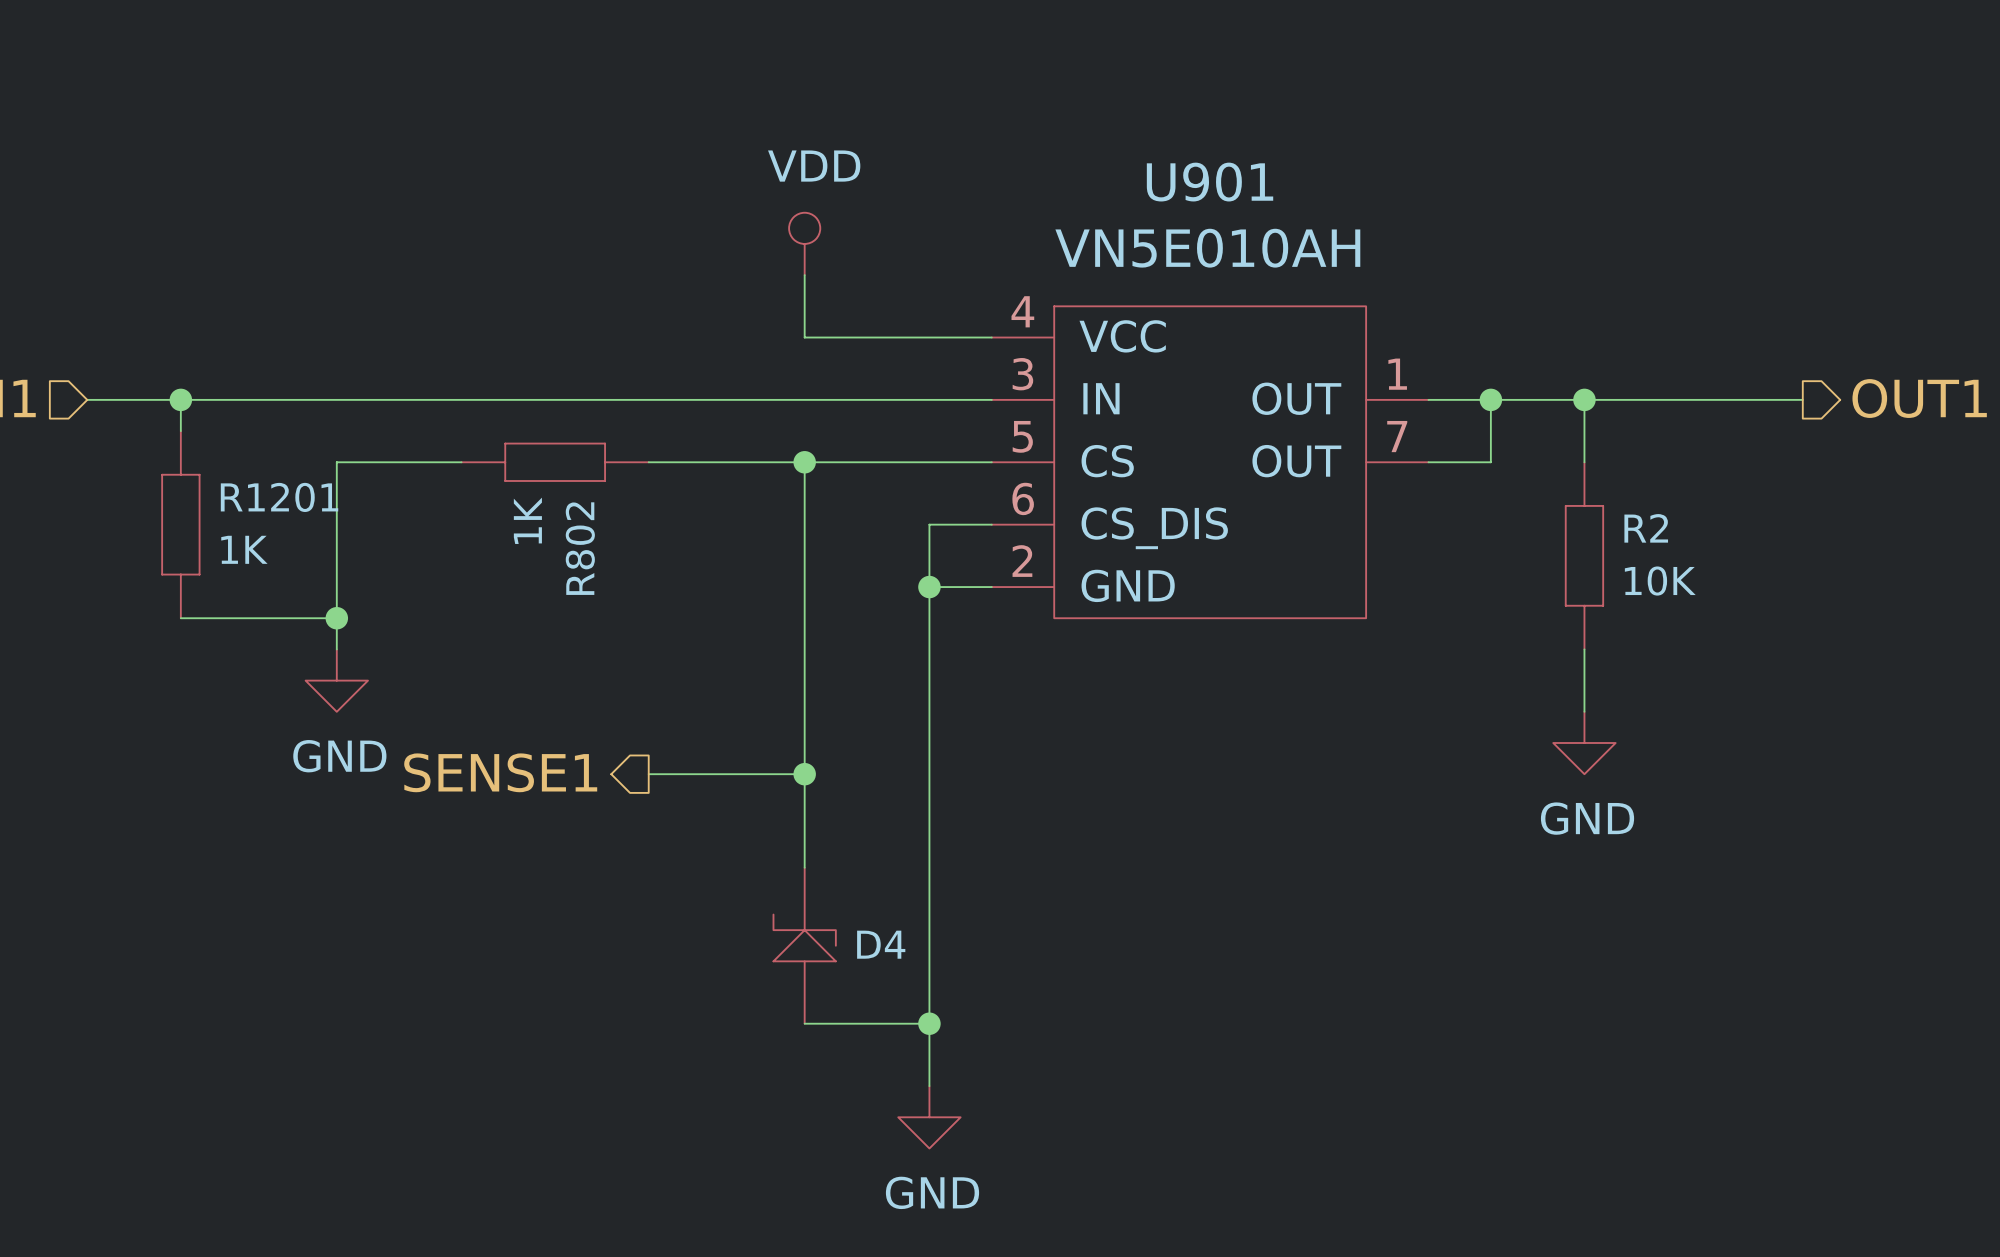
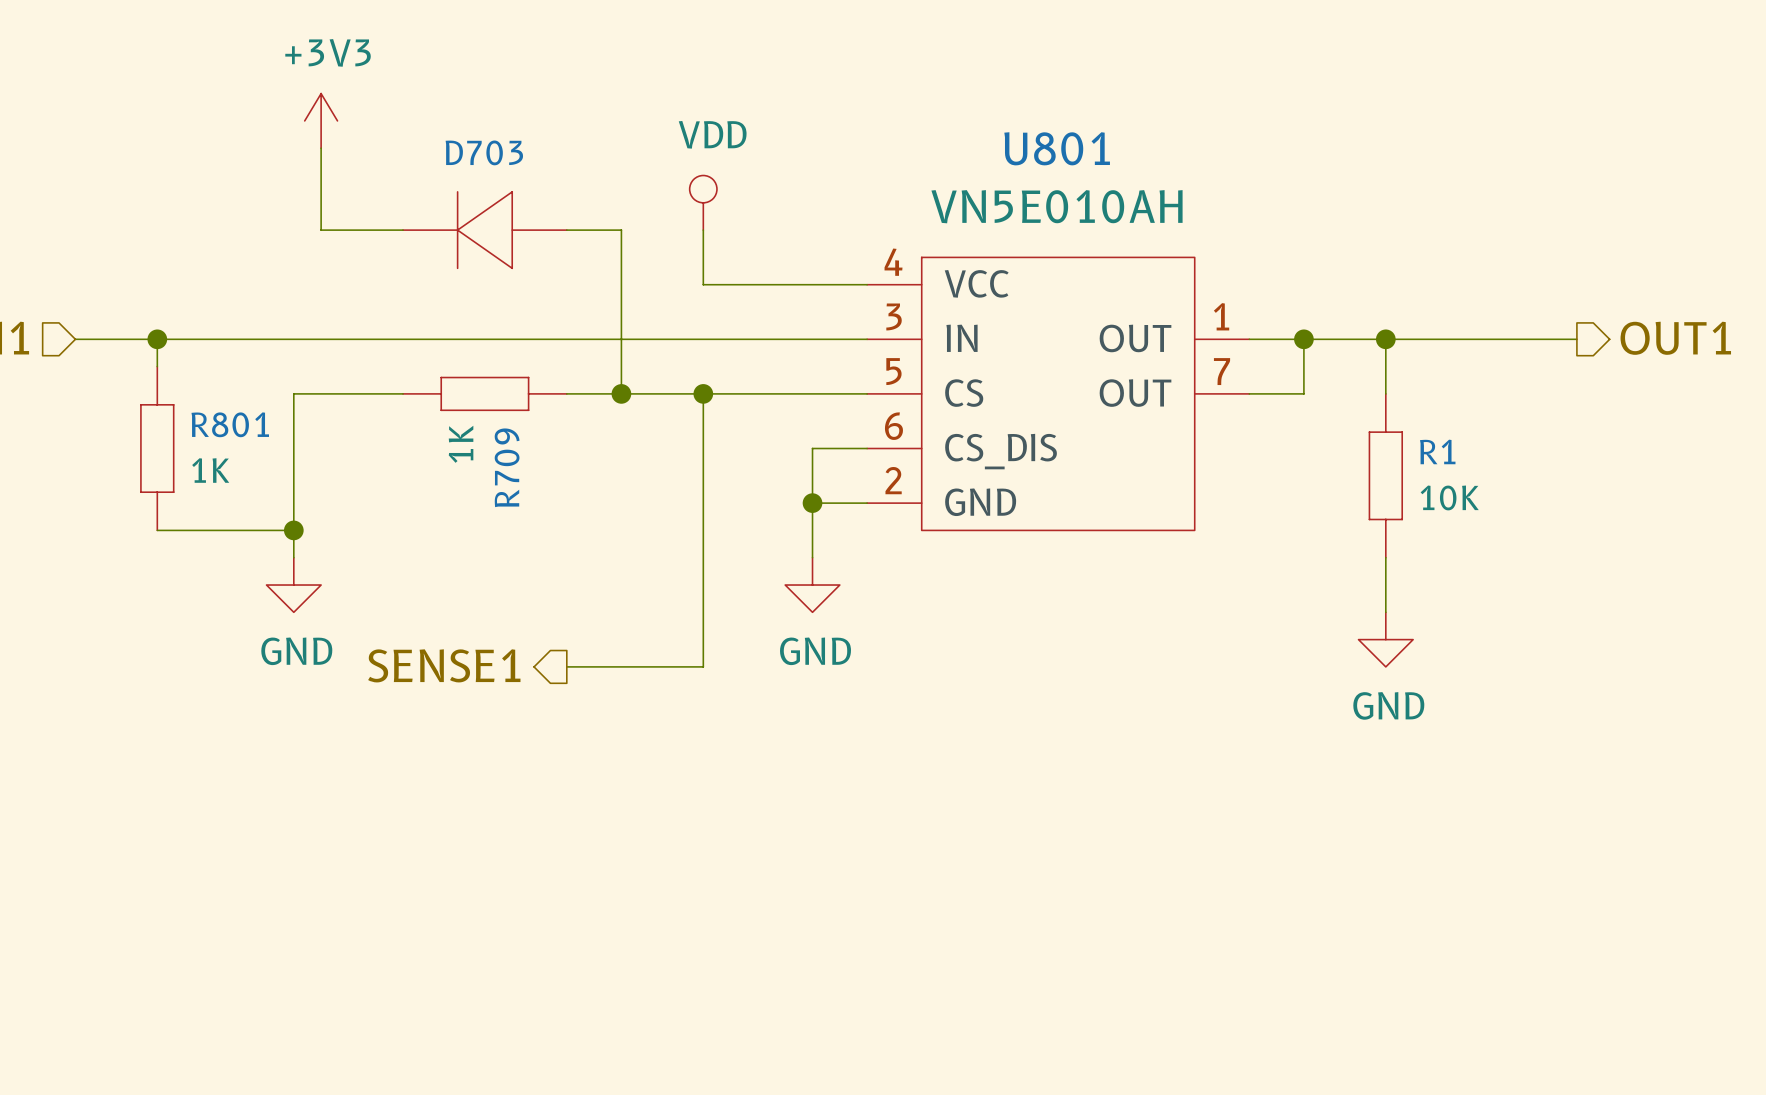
power symbol: none -> +3V3 (321, 120)
wire: none -> (321, 148) (321, 230) (403, 230)
U901 name: U901 (1210, 182) -> U801 (1057, 148)
D703: none -> (484, 230)
wire: none -> (566, 230) (621, 230) (621, 393)
junction: none -> (621, 393)
R1201 name: R1201 (279, 497) -> R801 (230, 424)
R2 name: R2 (1646, 528) -> R1 (1437, 451)
R802 name: R802 (580, 548) -> R709 (507, 467)
wire: (929, 649) (929, 1086) -> none
wire: (804, 774) (804, 867) -> none
junction: (804, 774) -> none
D4: (804, 945) -> none
wire: (804, 1023) (929, 1023) -> none
junction: (929, 1023) -> none
power symbol position: GND (929, 1117) -> GND (812, 585)

